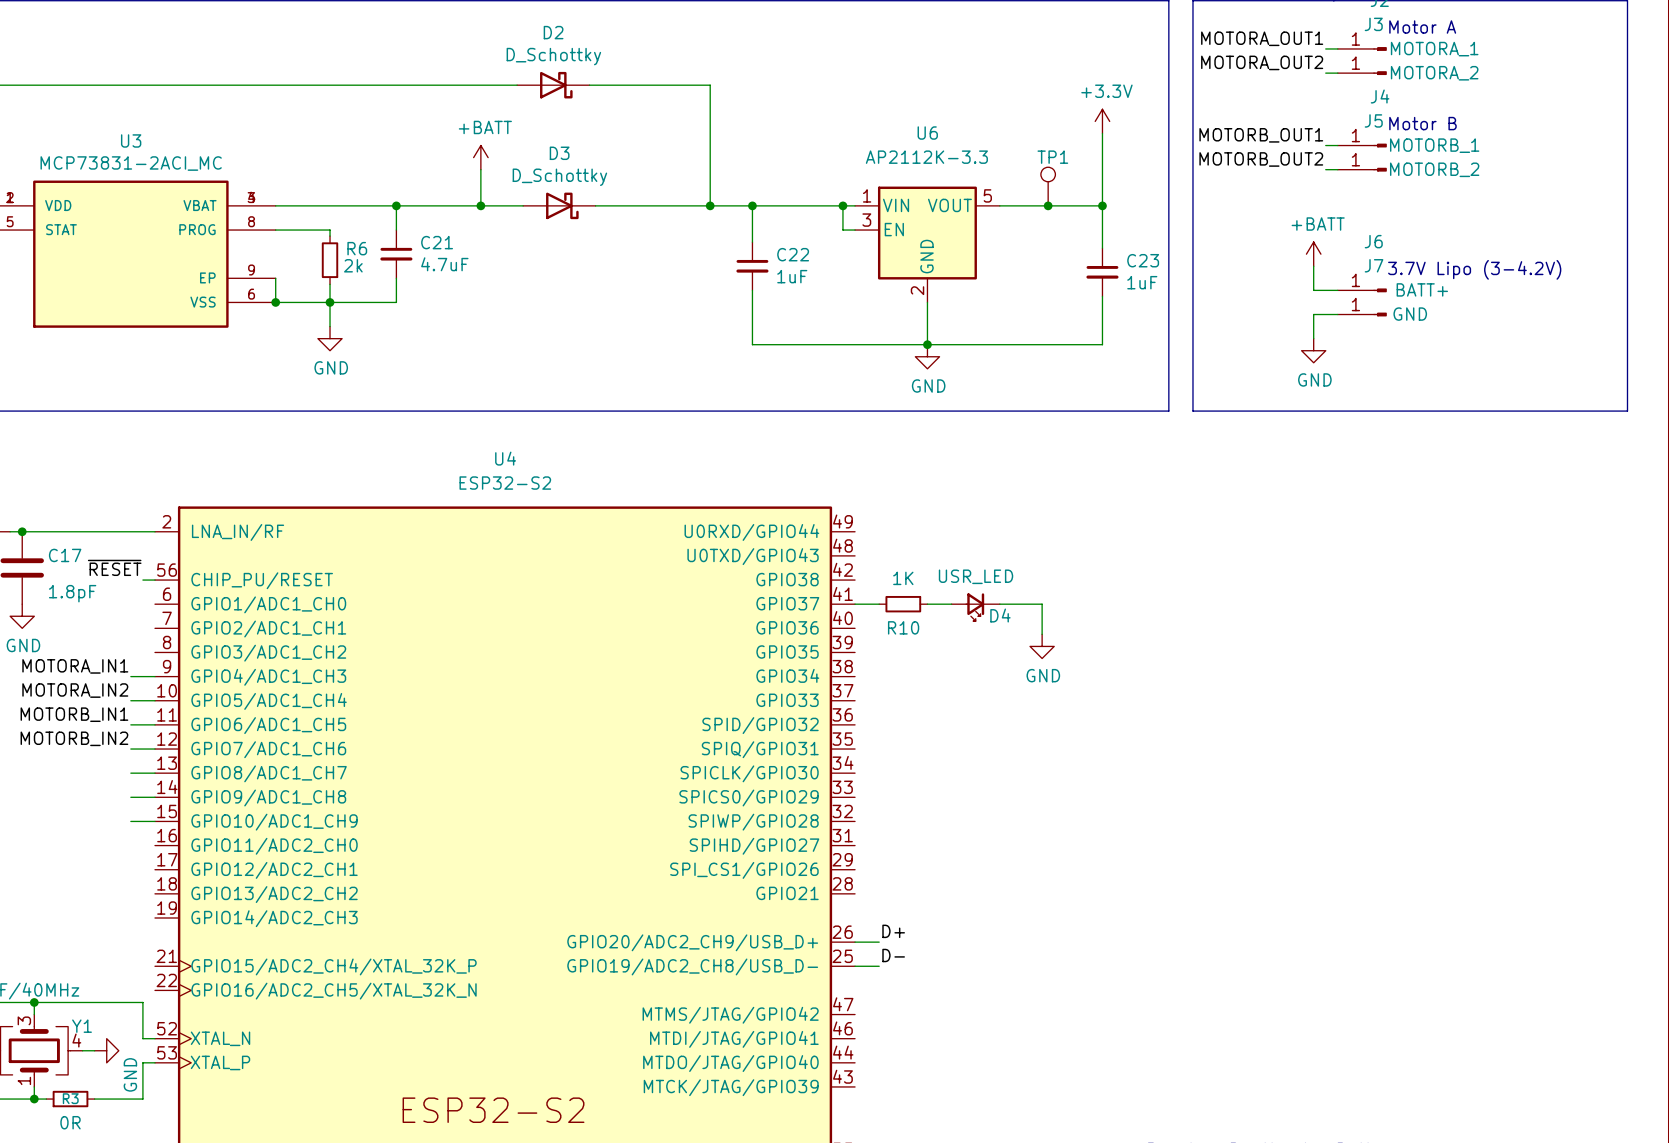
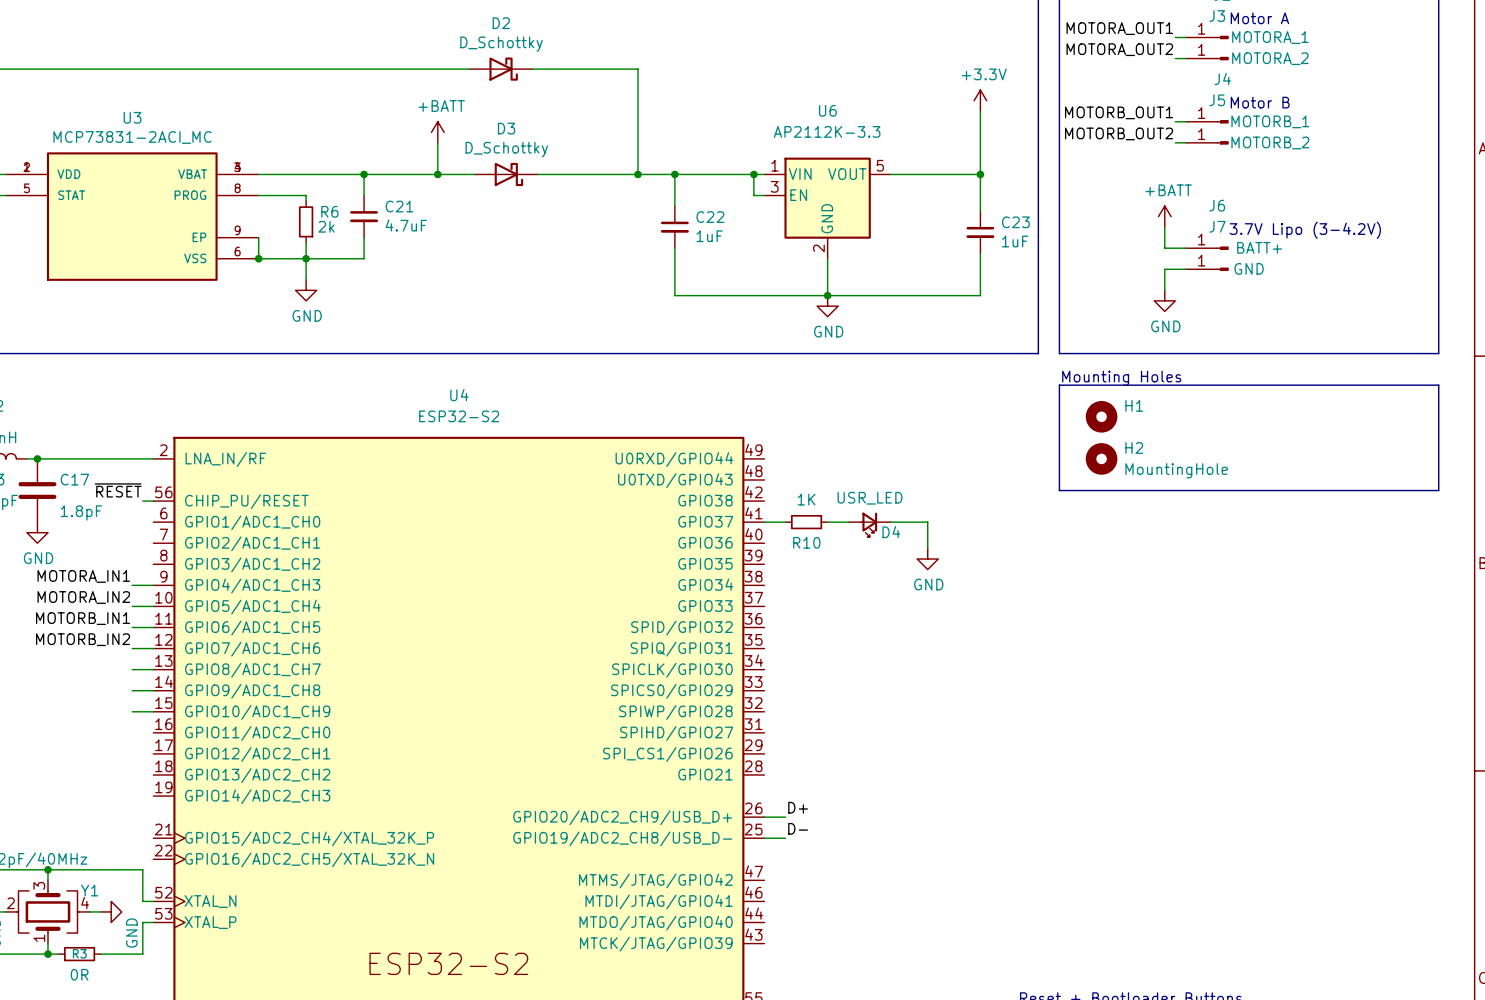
TP1: (1048, 186) -> none
junction: (1048, 205) -> none
text: none -> Mounting Holes (1121, 378)
line: none -> (1059, 385) (1059, 490) (1438, 490) (1438, 385) (1059, 385)
H1: none -> (1101, 416)
H2: none -> MountingHole (1101, 458)

